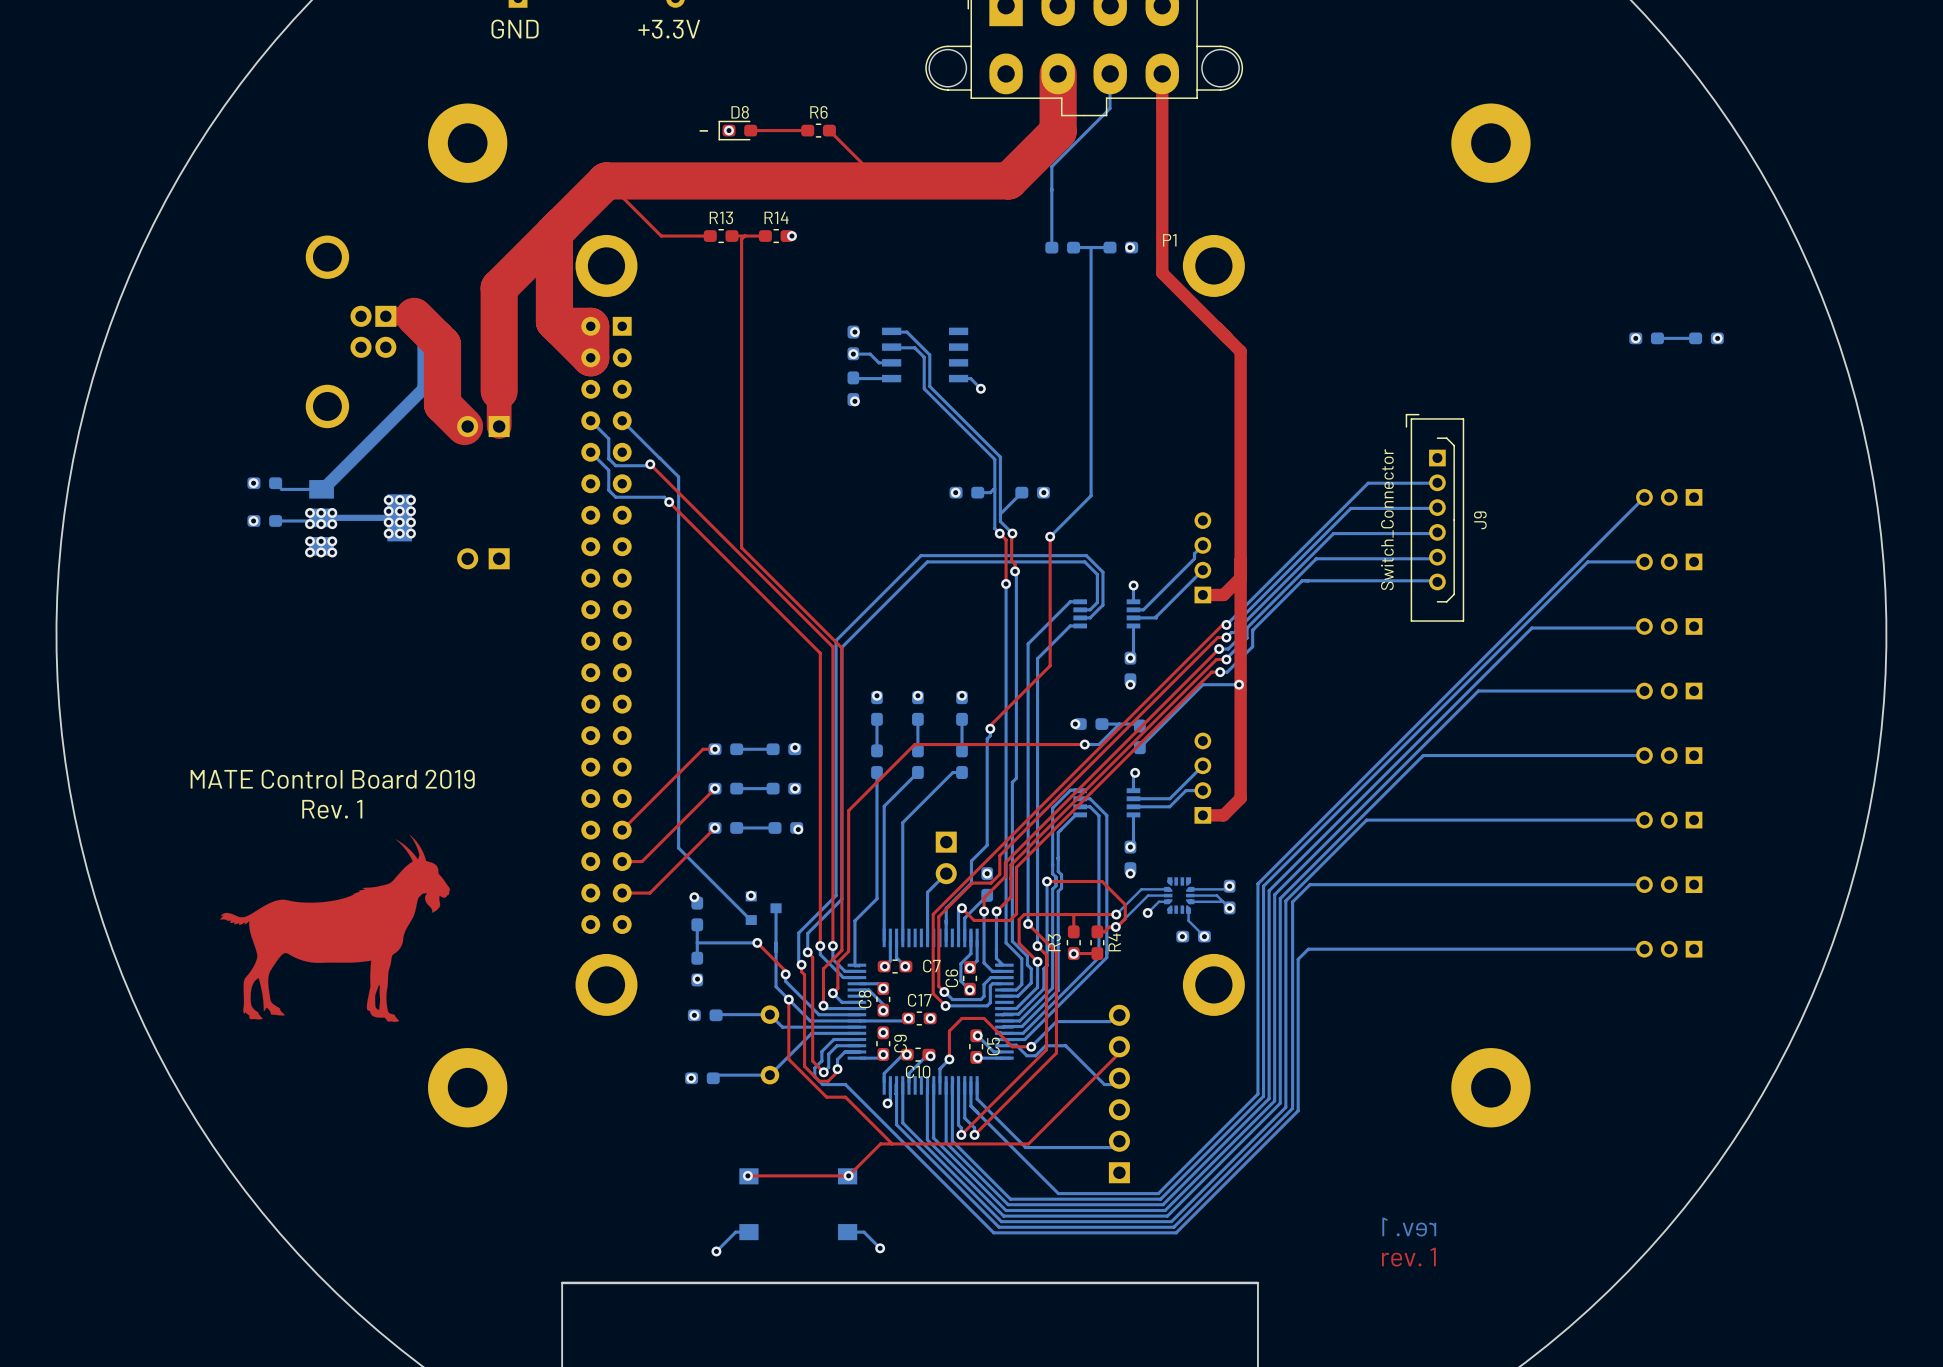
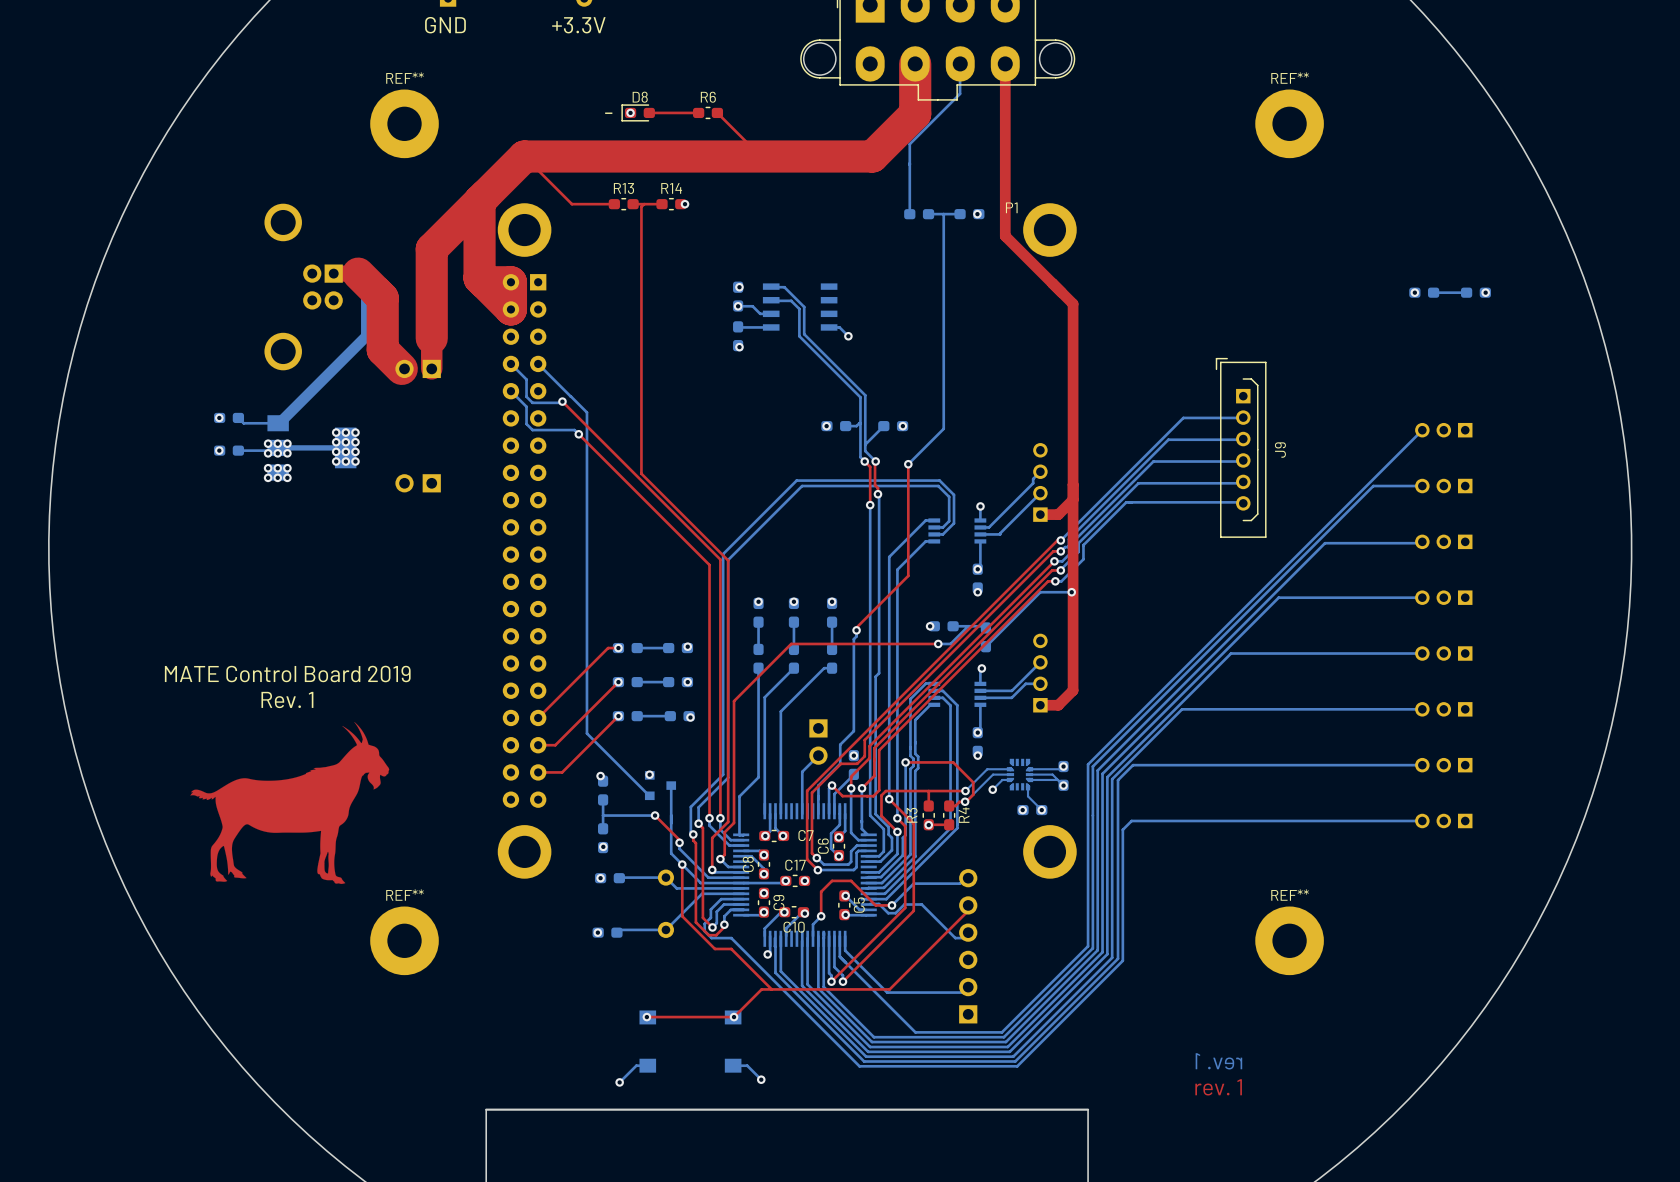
REF** name: none -> REF** (404, 78)
REF** name: none -> REF** (1290, 78)
J9 value: Switch_Connector (1387, 519) -> none
REF** name: none -> REF** (404, 895)
REF** name: none -> REF** (1290, 895)

